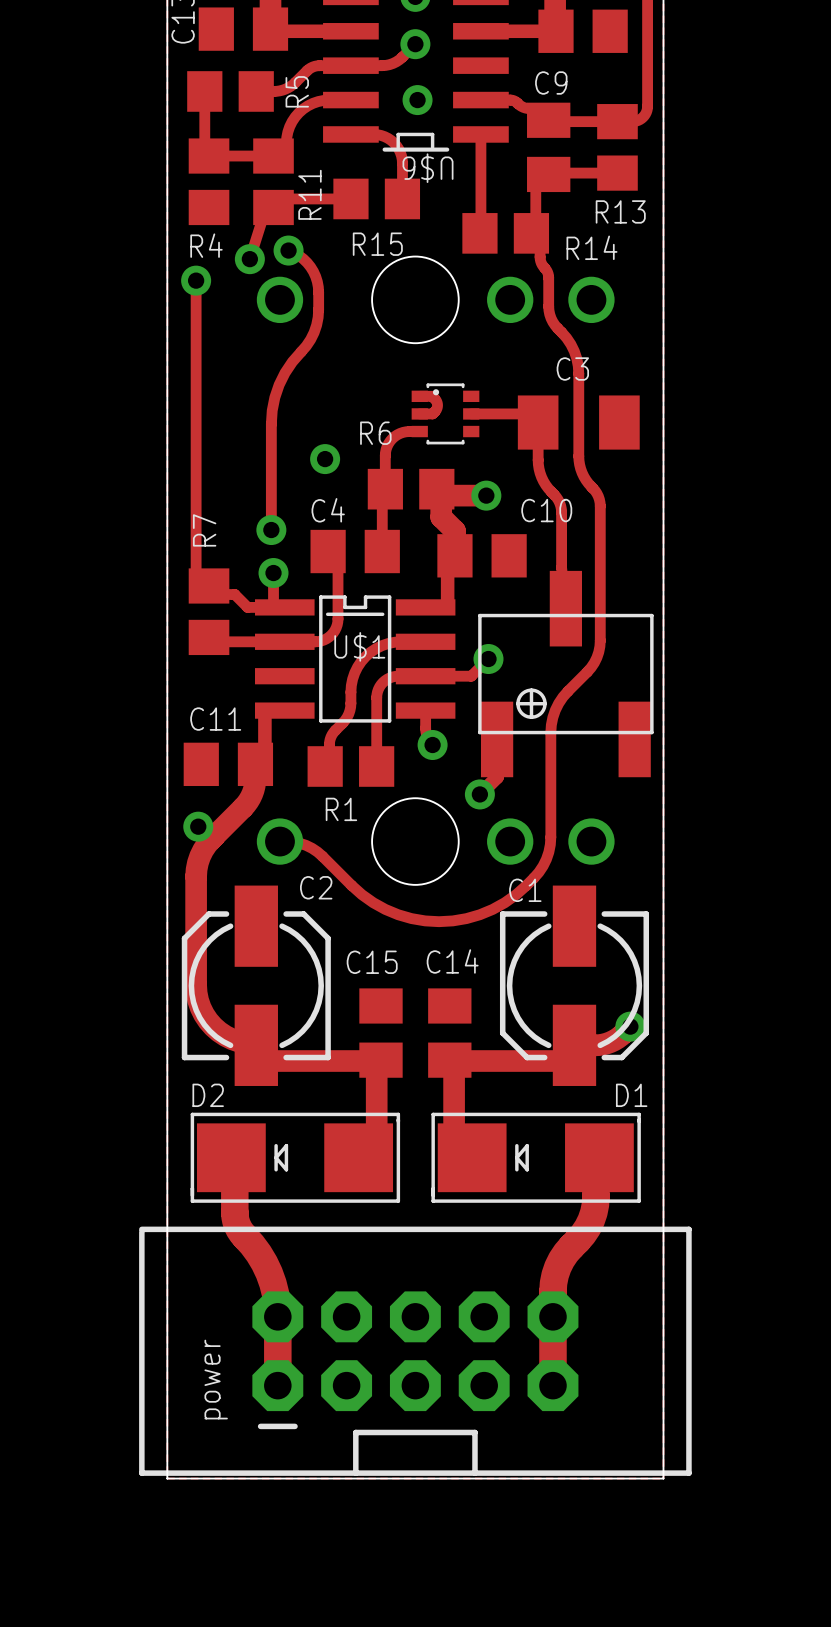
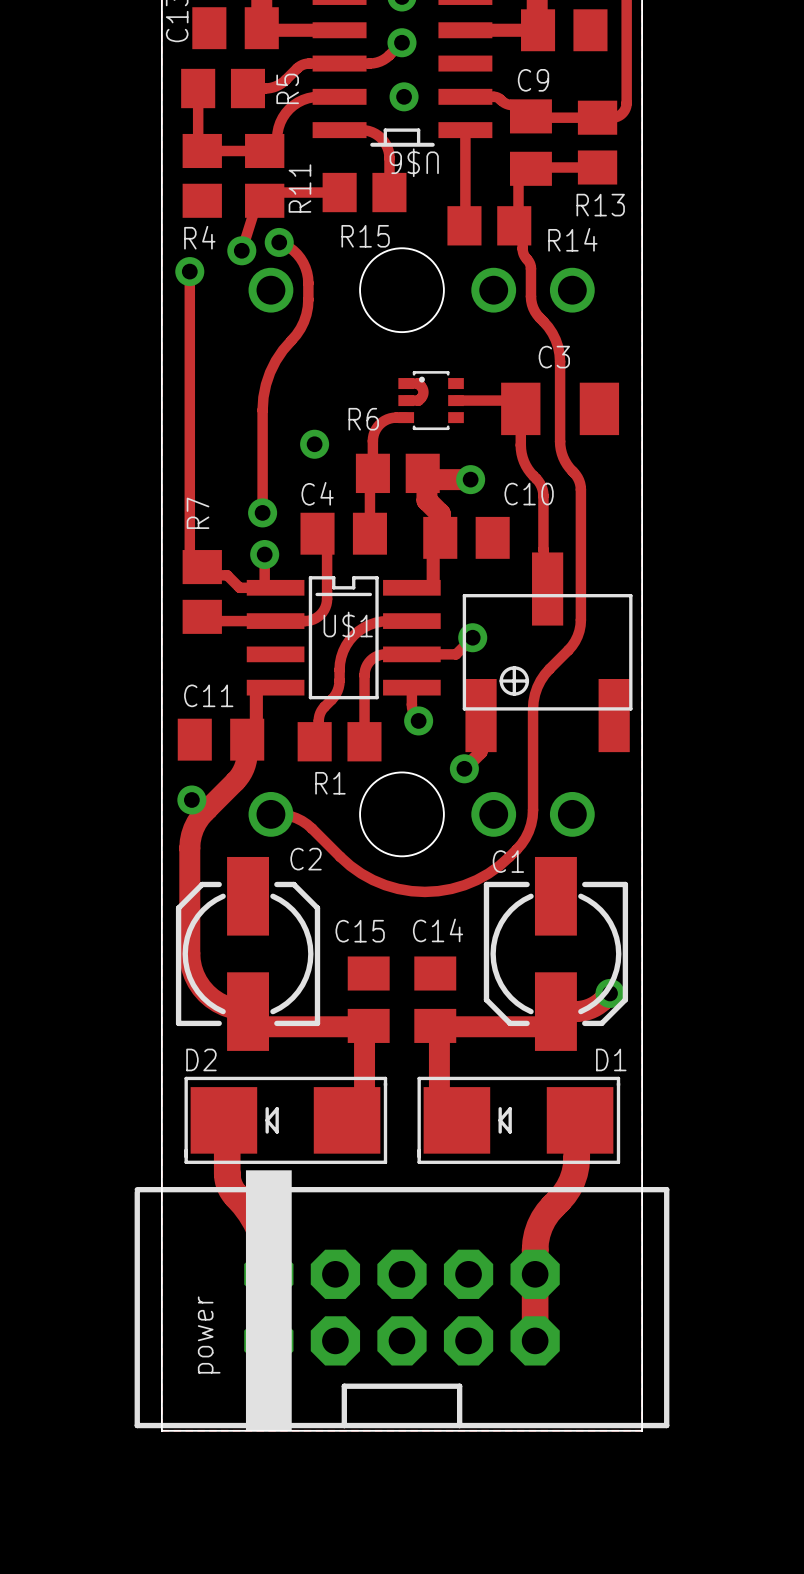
drawing: none -> [245, 1170, 292, 1431]

